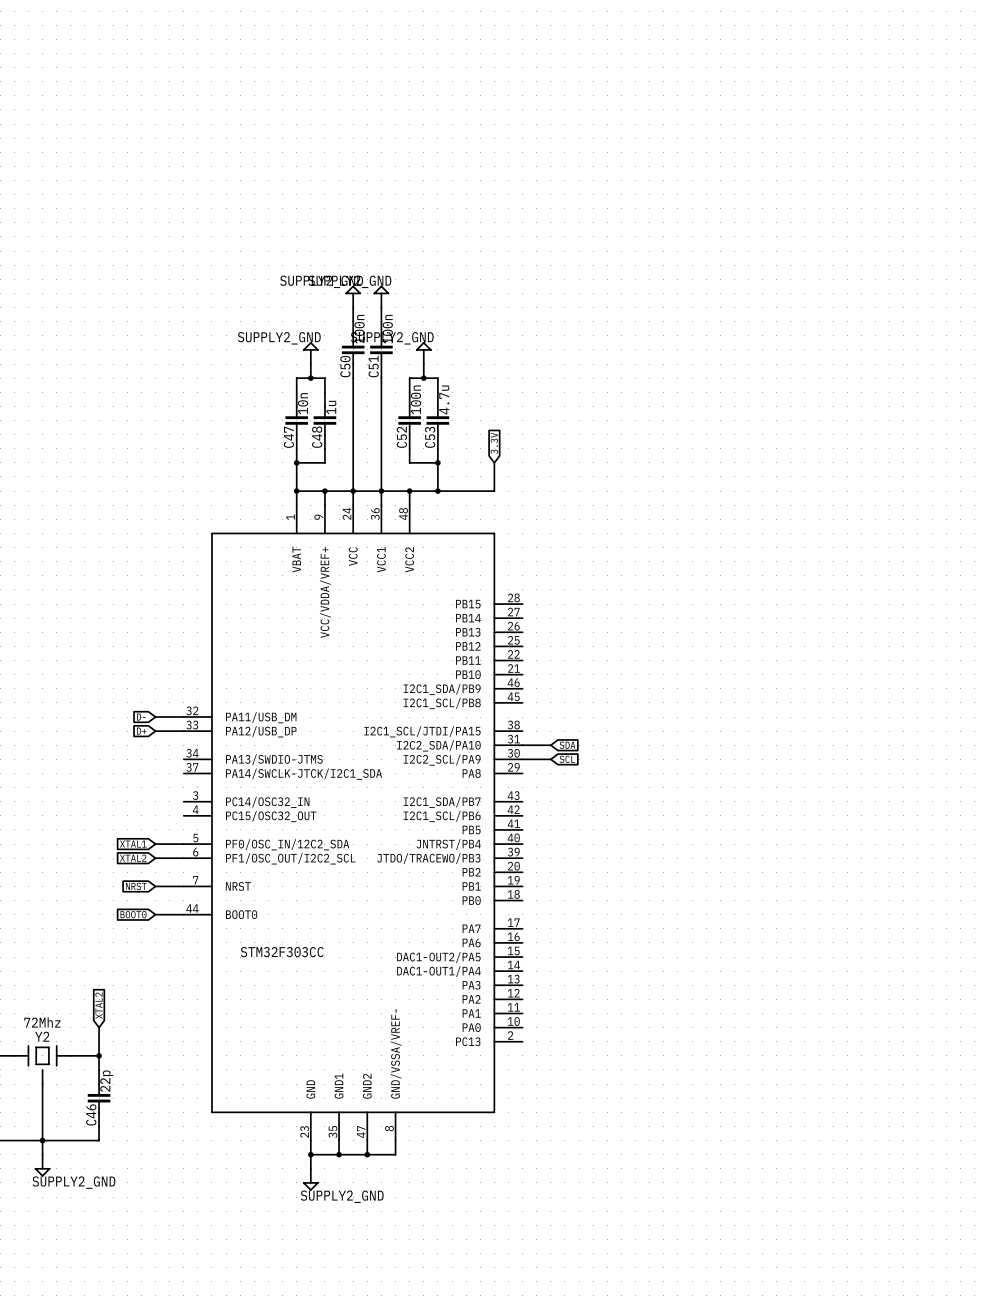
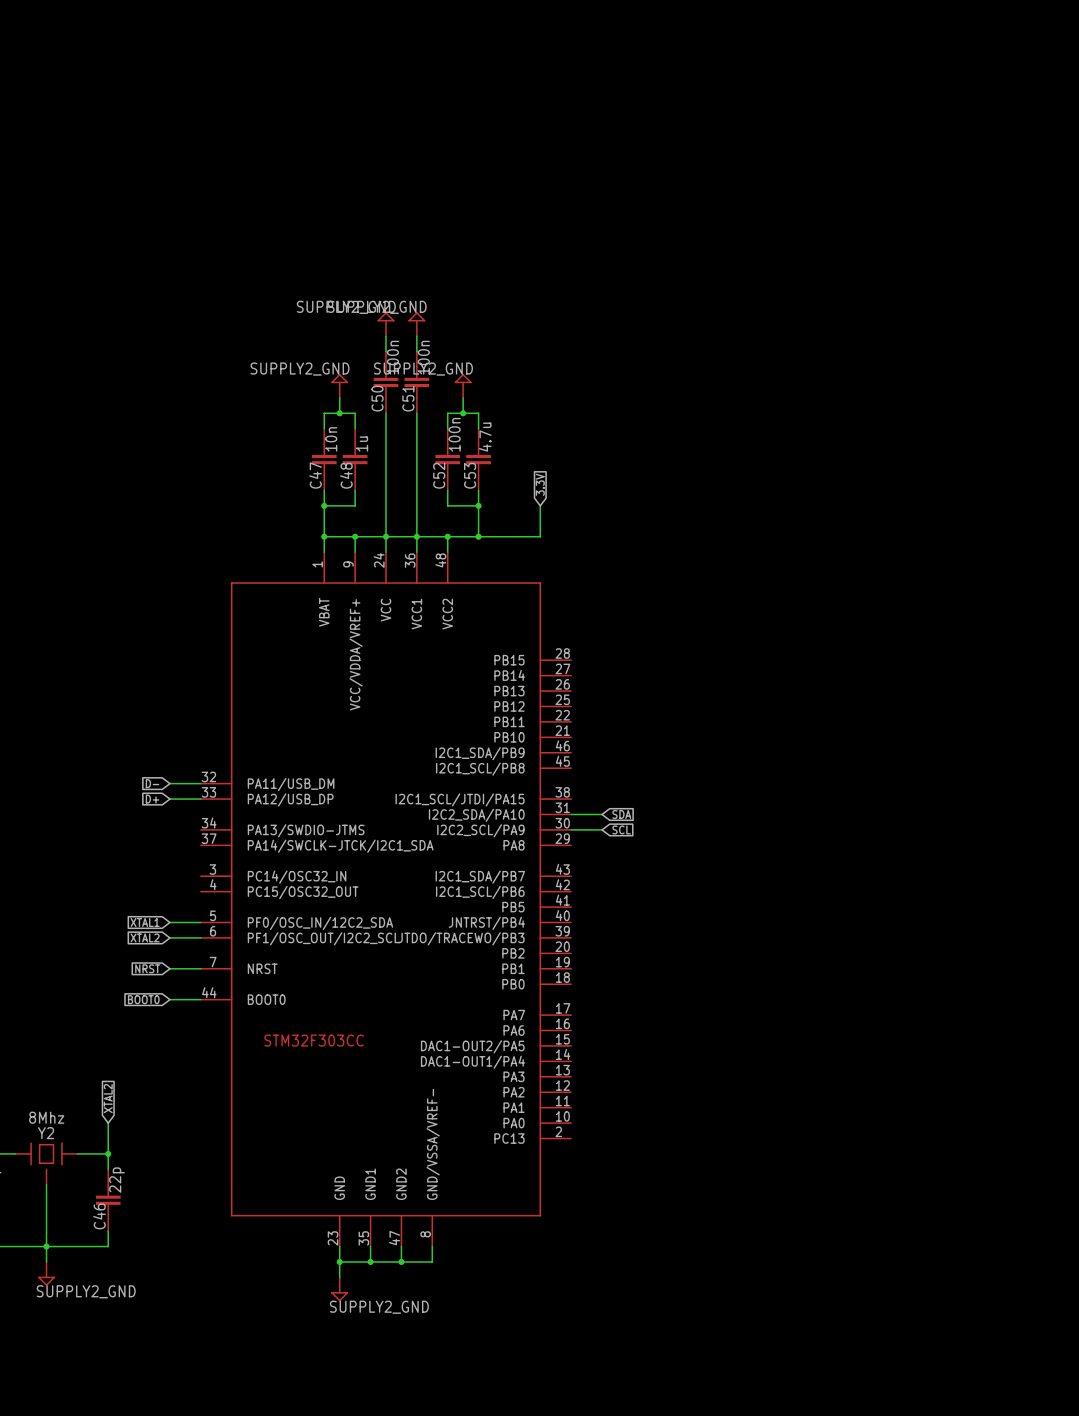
Y2 value: 72Mhz (42, 1022) -> 8Mhz (46, 1117)

